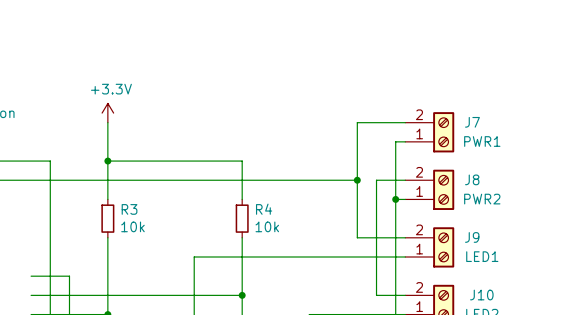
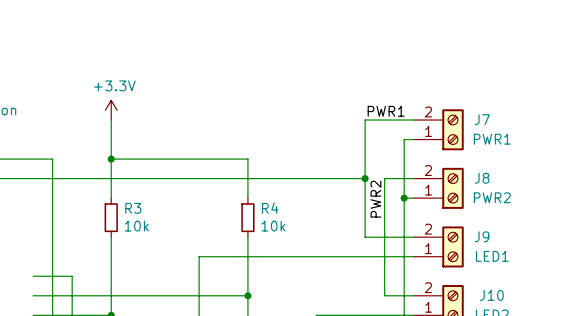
label: none -> PWR1 (386, 111)
label: none -> PWR2 (375, 199)

